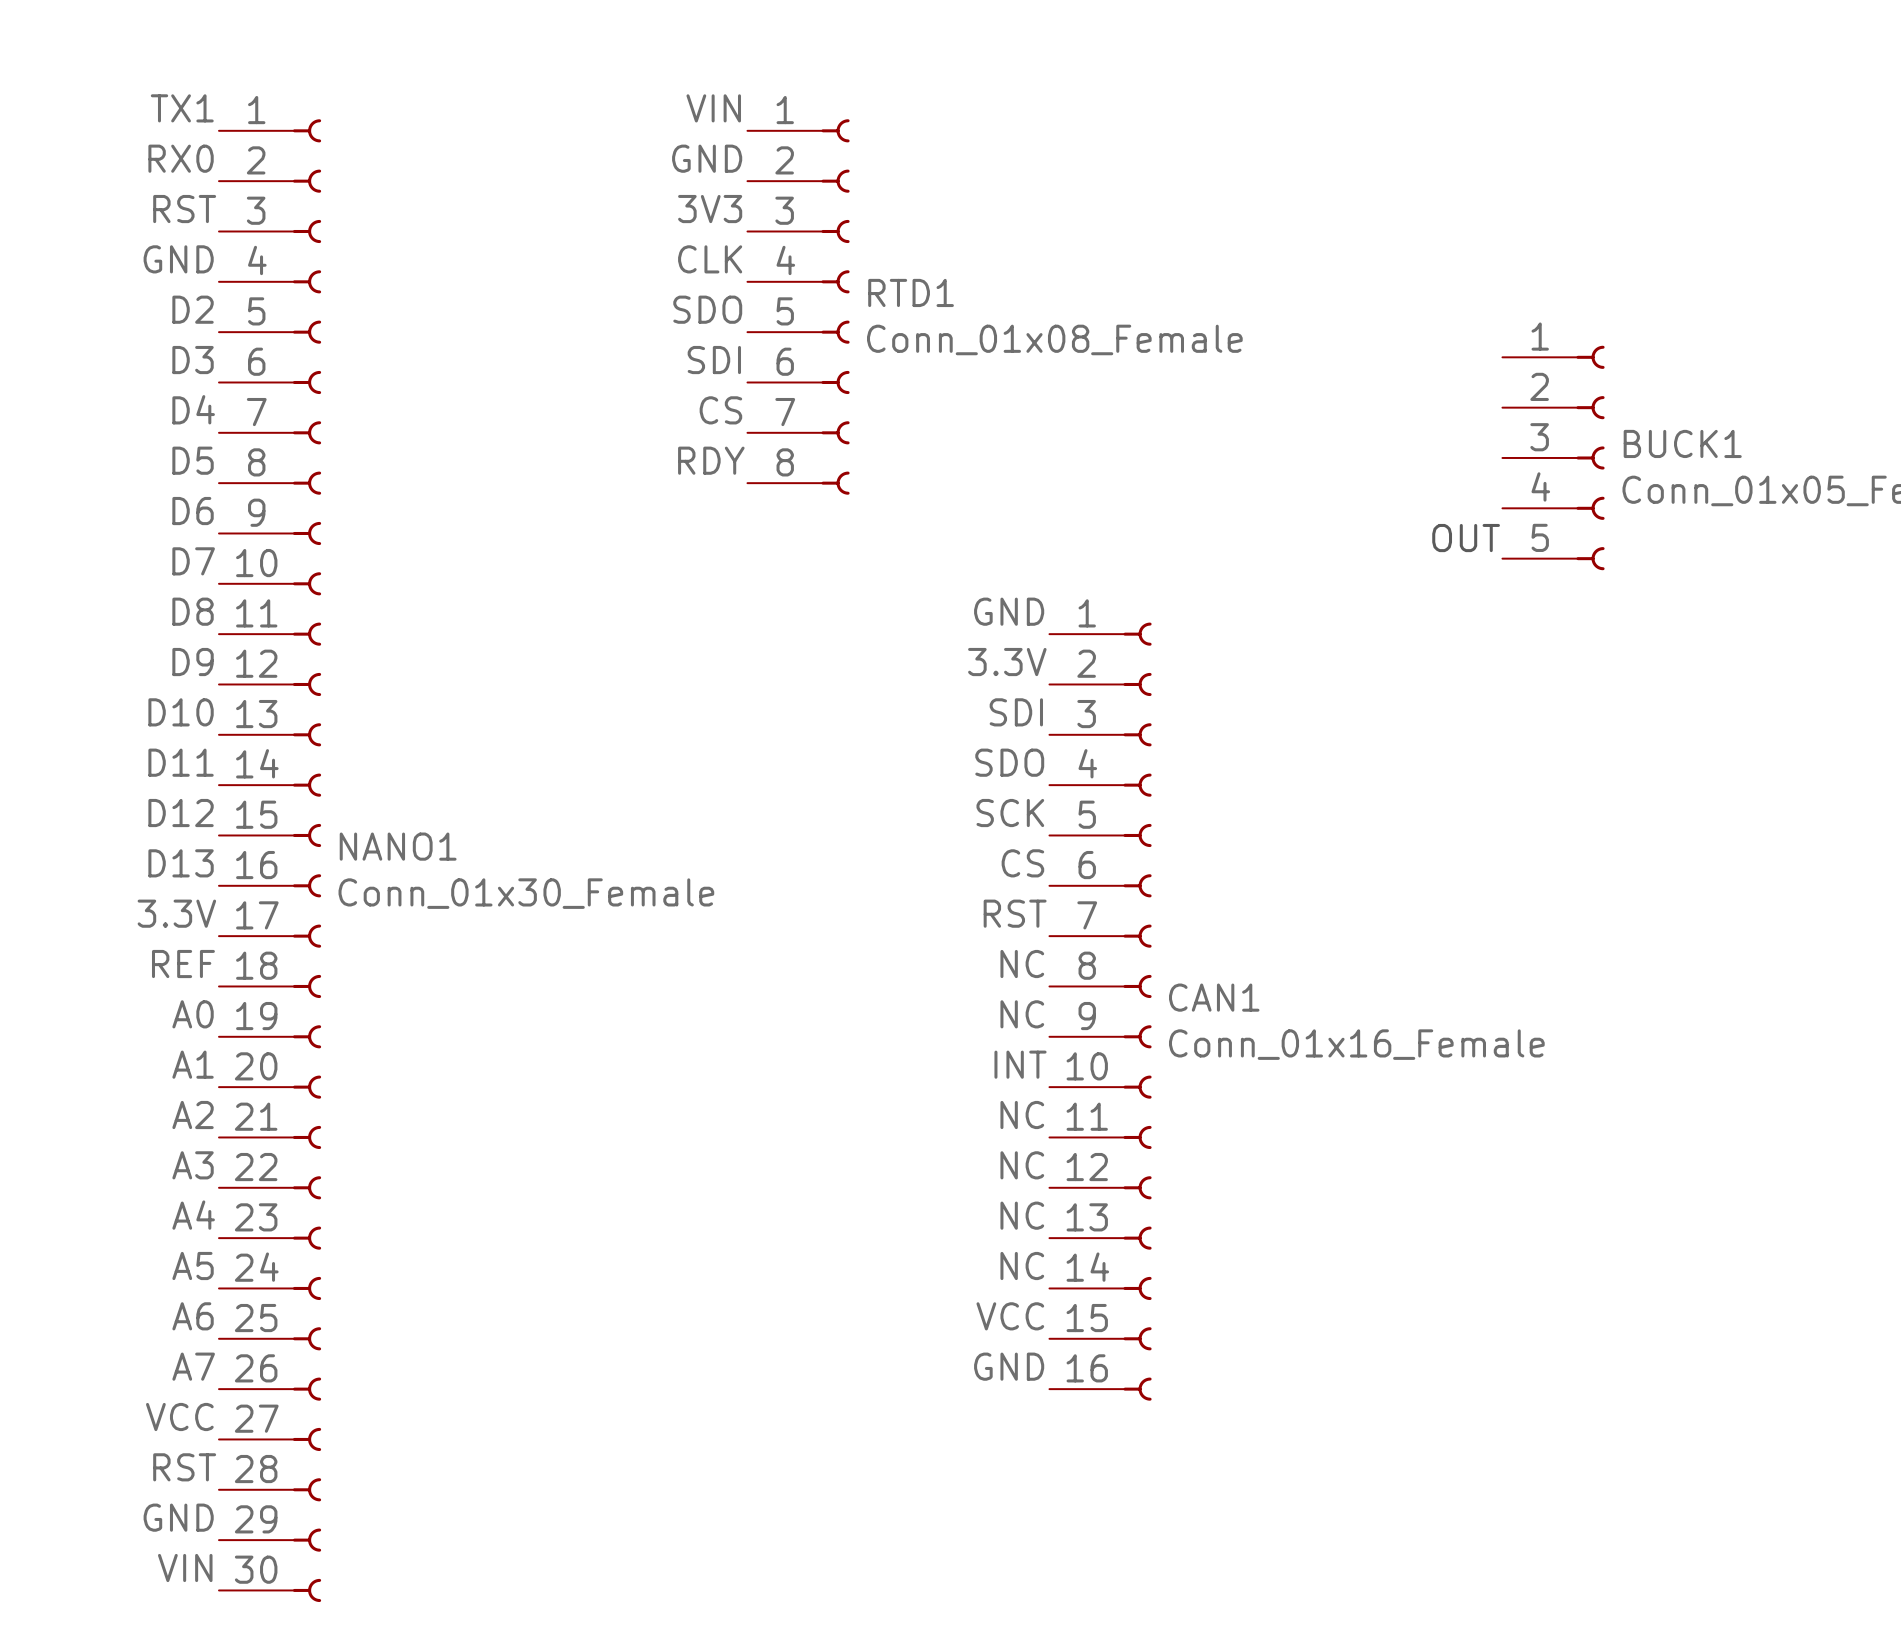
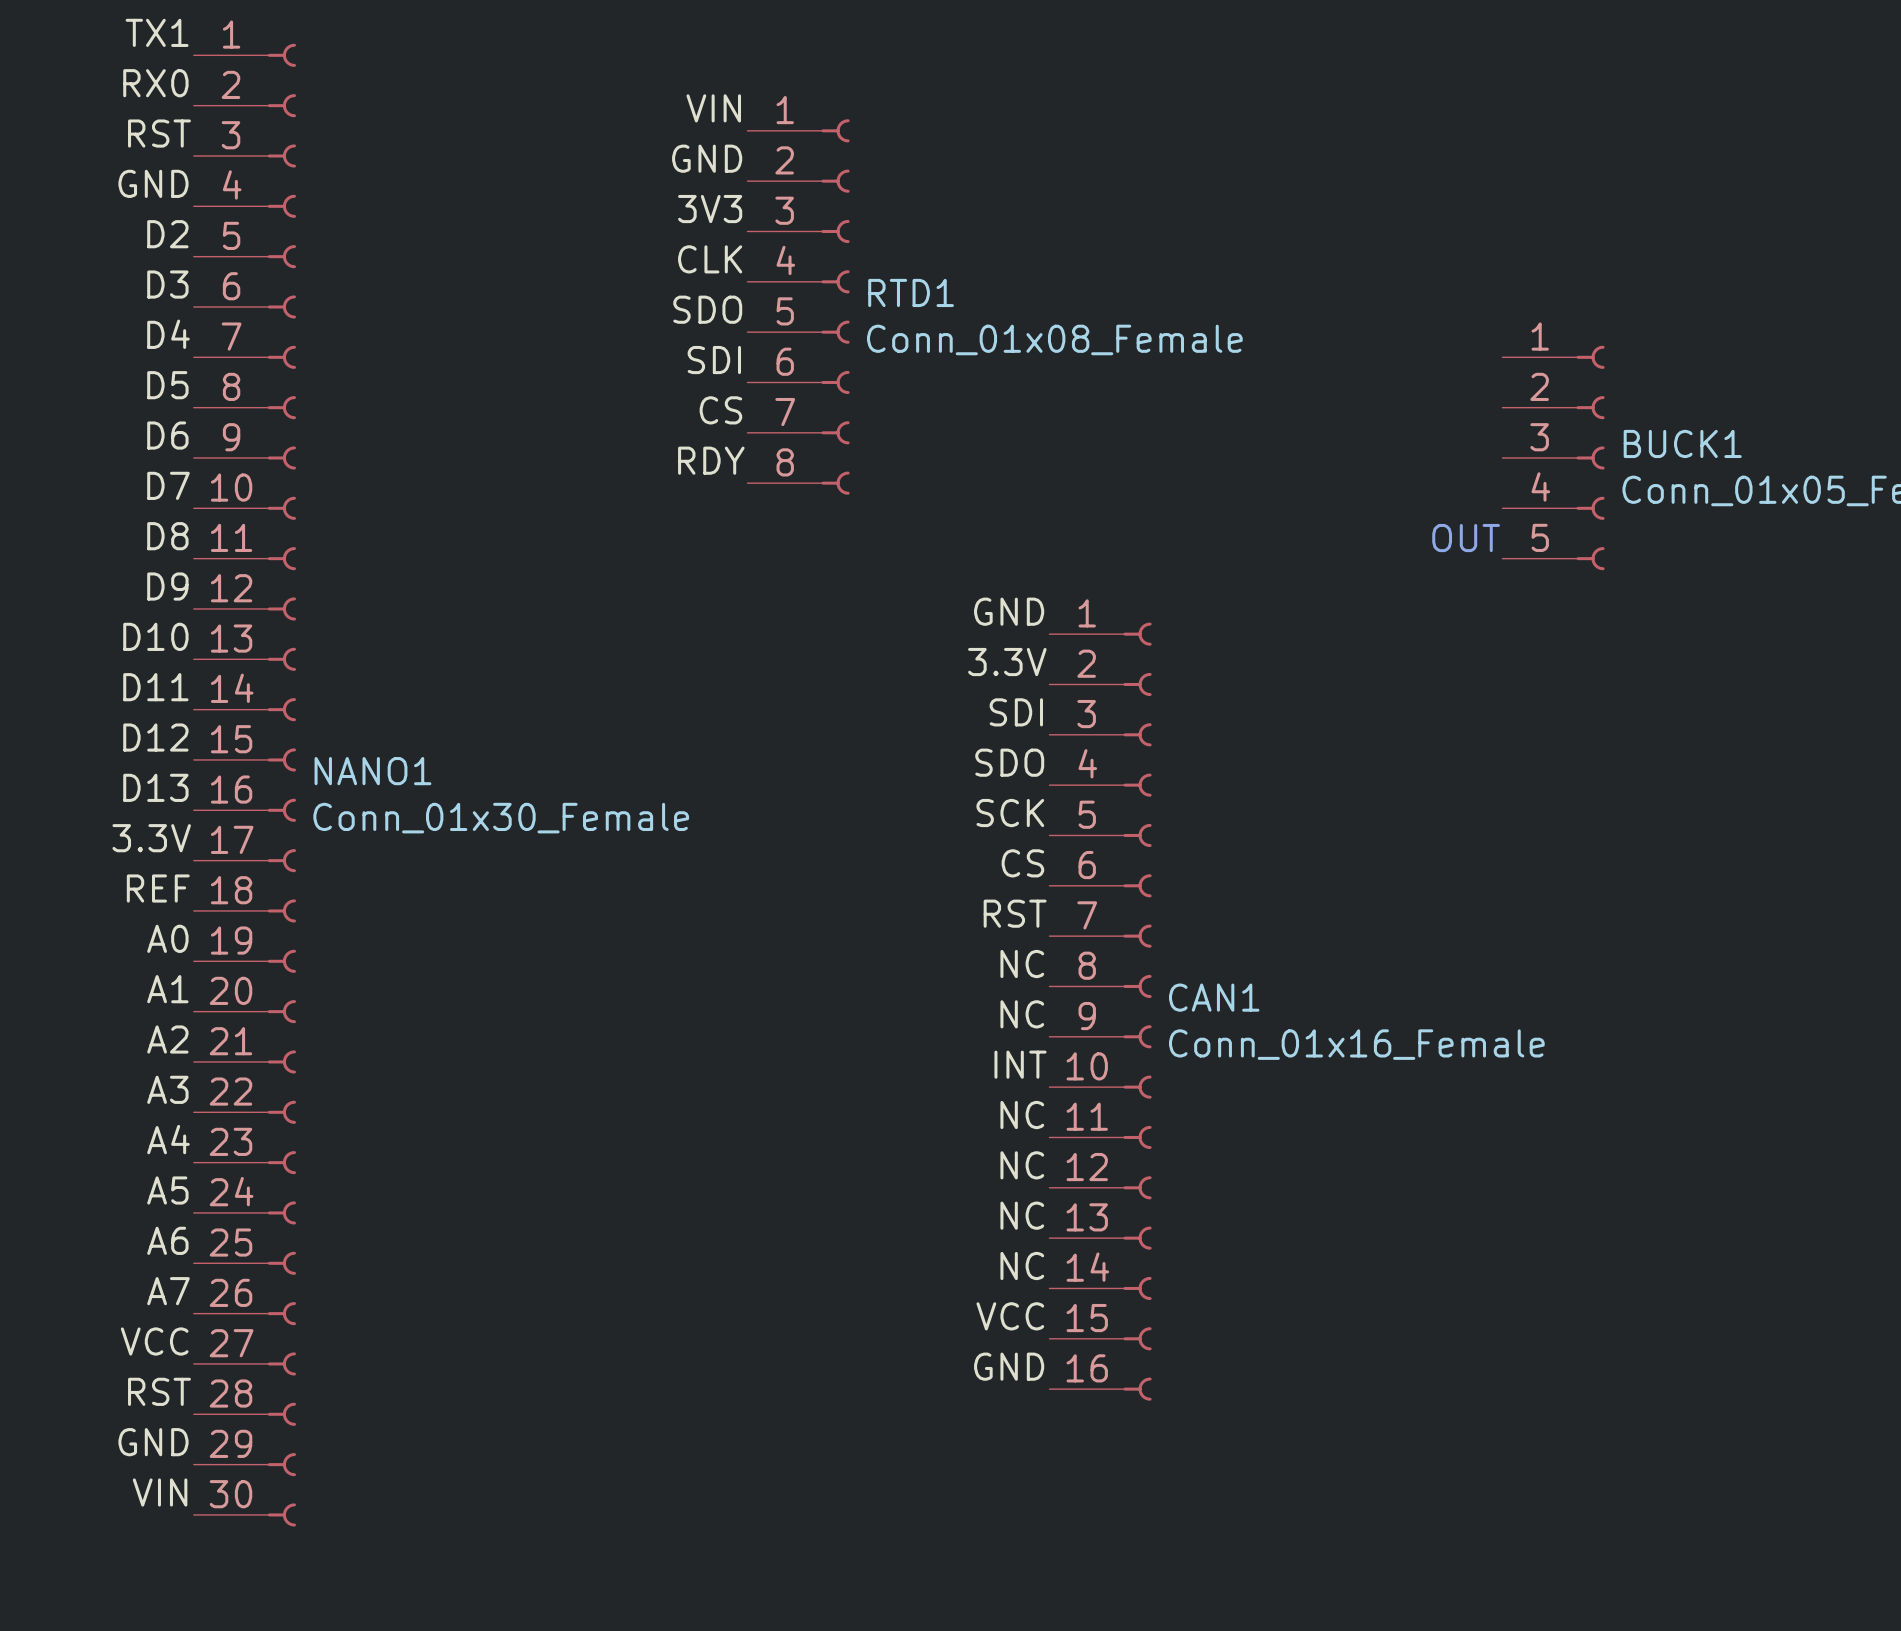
label position: TX1 (182, 108) -> TX1 (157, 32)
label position: RX0 (181, 158) -> RX0 (155, 83)
label position: RST (184, 209) -> RST (159, 133)
label position: GND (178, 259) -> GND (153, 183)
label position: D2 (193, 309) -> D2 (167, 234)
label position: D3 (193, 360) -> D3 (167, 284)
label position: D4 (193, 409) -> D4 (168, 334)
label position: D5 (193, 460) -> D5 (167, 385)
label position: D6 (193, 511) -> D6 (167, 435)
label position: D7 (193, 561) -> D7 (168, 485)
label position: D8 (193, 611) -> D8 (167, 536)
label position: D9 (193, 662) -> D9 (167, 586)
label position: D10 (181, 712) -> D10 (155, 636)
label position: D11 (181, 762) -> D11 (155, 687)
label position: D12 (181, 813) -> D12 (155, 737)
NANO1 position: (270, 860) -> (244, 785)
label position: D13 (181, 863) -> D13 (155, 787)
label position: 3.3V (176, 913) -> 3.3V (151, 838)
label position: REF (183, 964) -> REF (158, 888)
label position: A0 (193, 1014) -> A0 (167, 938)
label position: A1 (193, 1064) -> A1 (167, 989)
label position: A2 (193, 1115) -> A2 (167, 1039)
label position: A3 (193, 1165) -> A3 (167, 1089)
label position: A4 (193, 1215) -> A4 (168, 1139)
label position: A5 (193, 1266) -> A5 (167, 1190)
label position: A6 (193, 1316) -> A6 (167, 1240)
label position: A7 (193, 1366) -> A7 (168, 1291)
label position: VCC (179, 1417) -> VCC (154, 1341)
label position: RST (184, 1467) -> RST (159, 1391)
label position: GND (178, 1517) -> GND (153, 1442)
label position: VIN (185, 1567) -> VIN (160, 1492)

